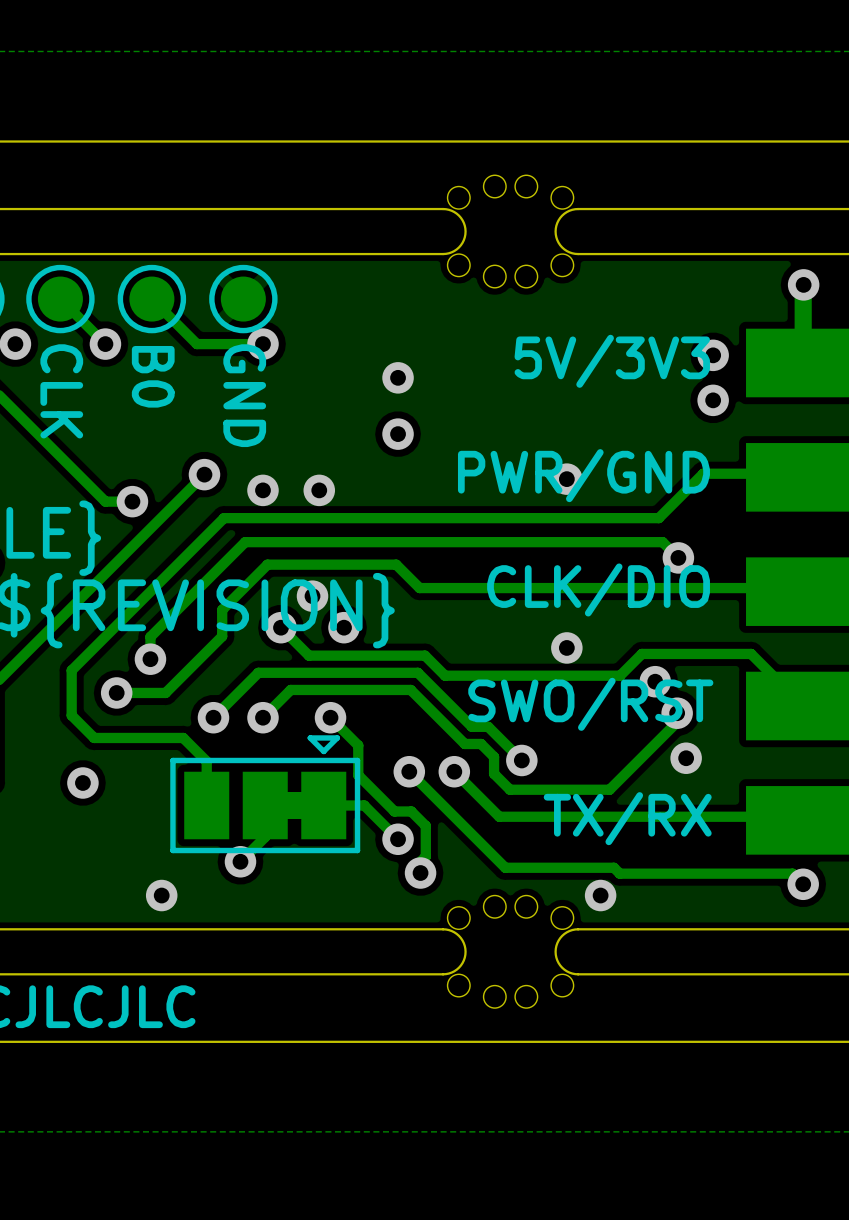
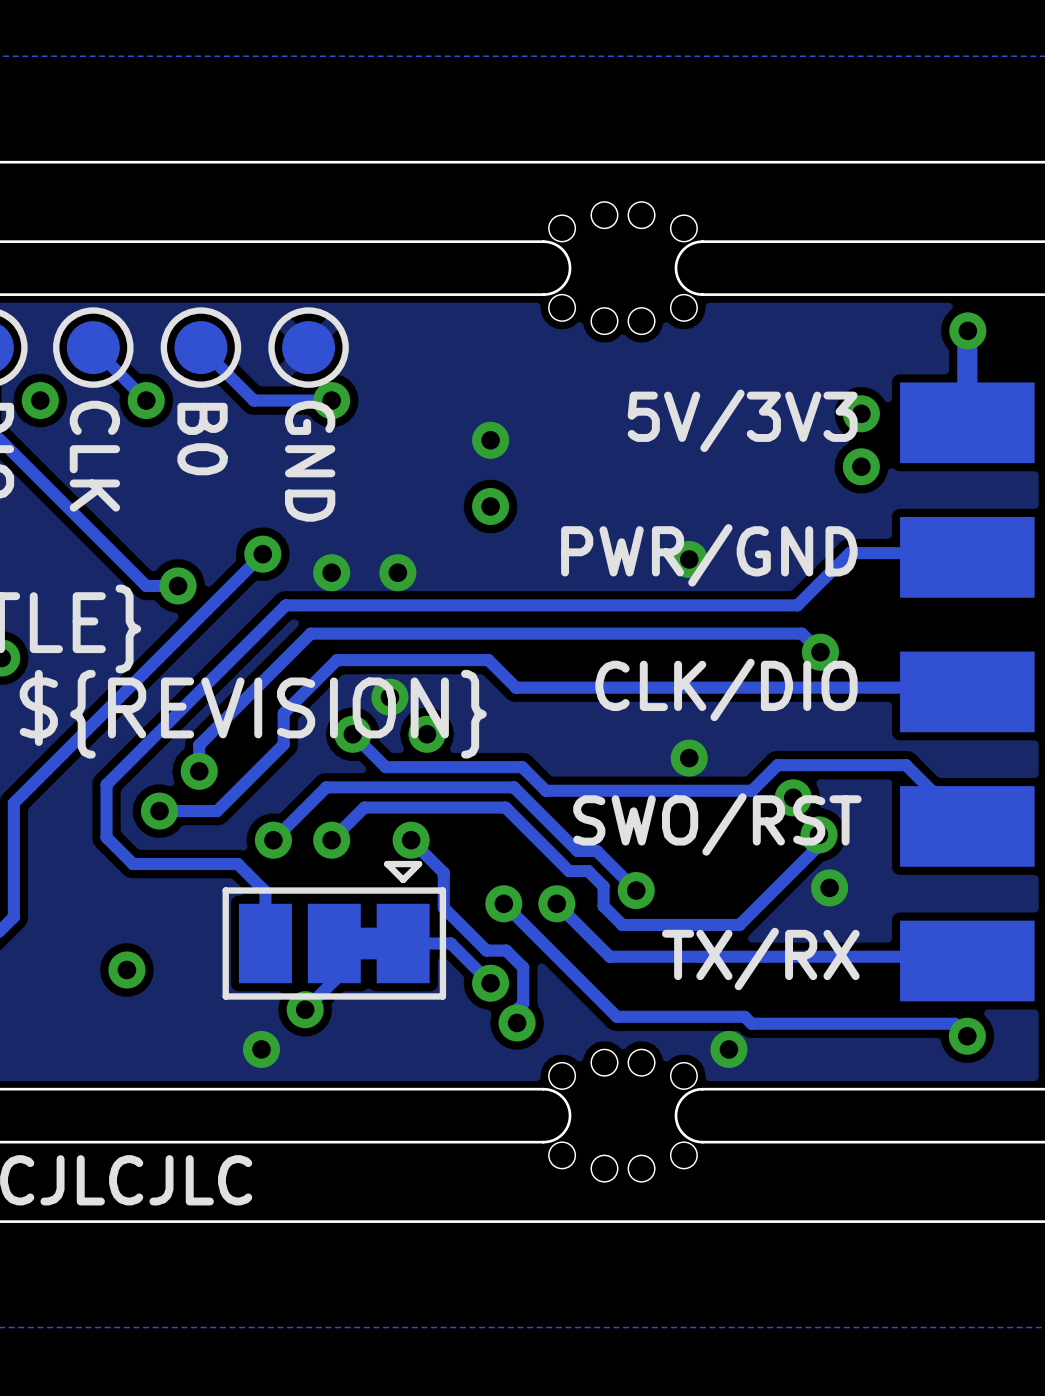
via position: (82, 782) -> (126, 969)
via position: (161, 895) -> (261, 1049)

